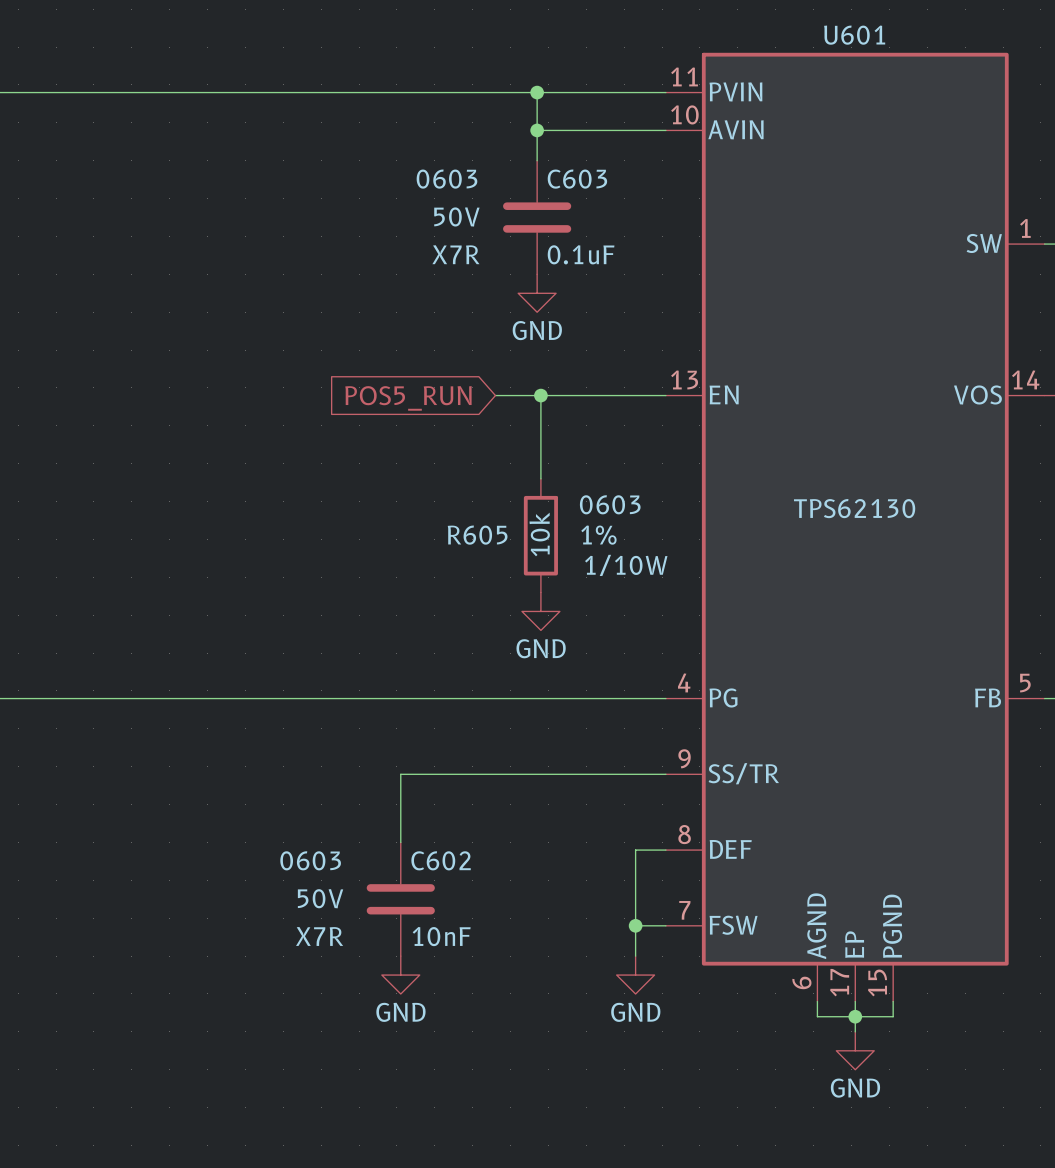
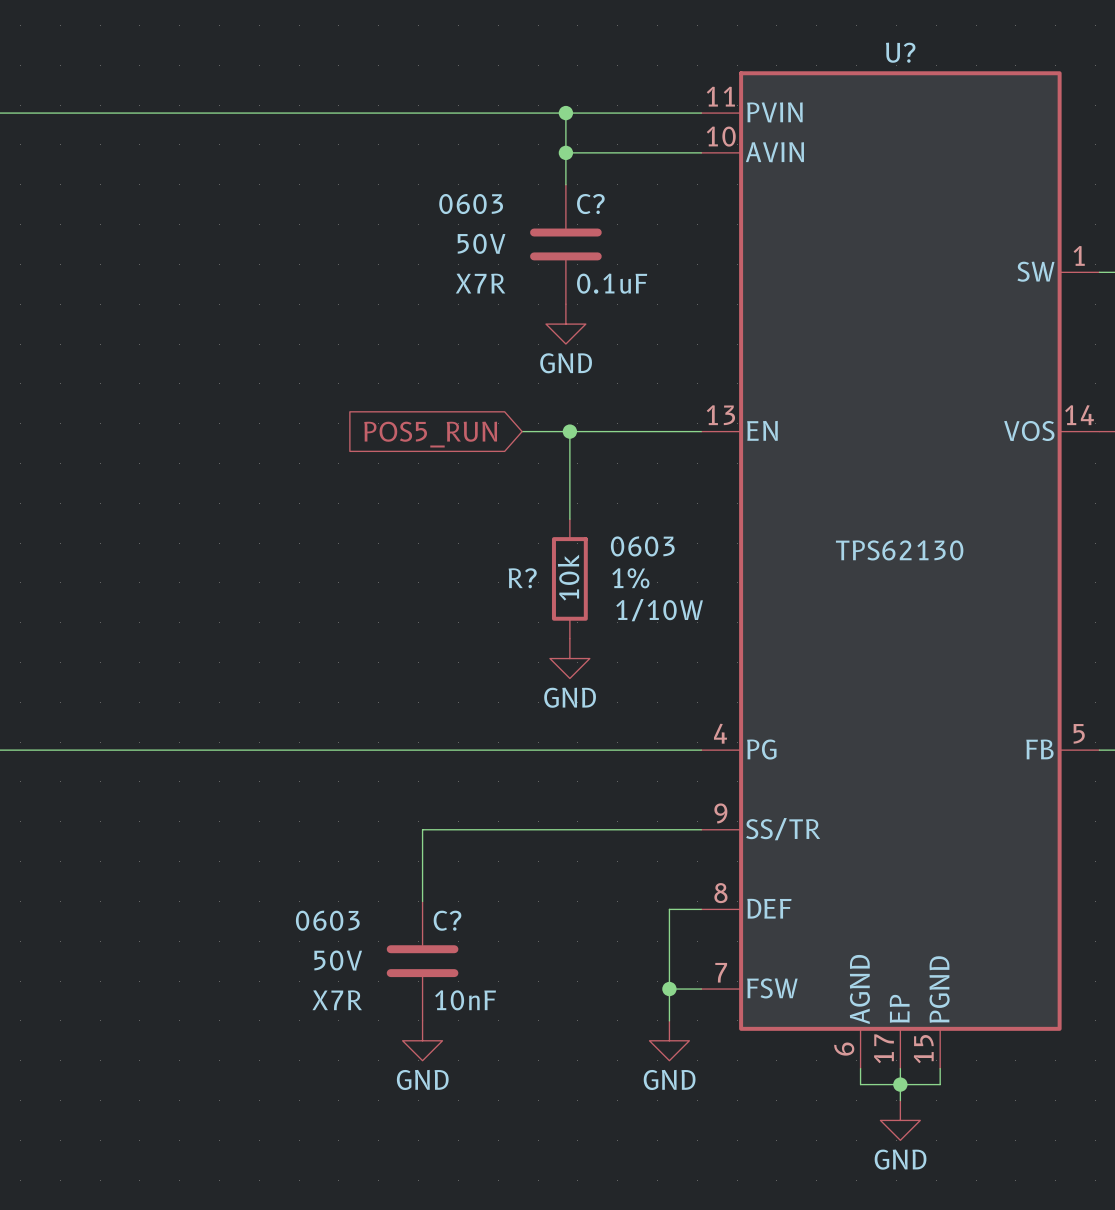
U601 name: U601 (854, 35) -> U? (900, 52)
C603 name: C603 (577, 179) -> C? (590, 204)
R605 name: R605 (477, 535) -> R? (522, 578)
C602 name: C602 (441, 860) -> C? (447, 920)

